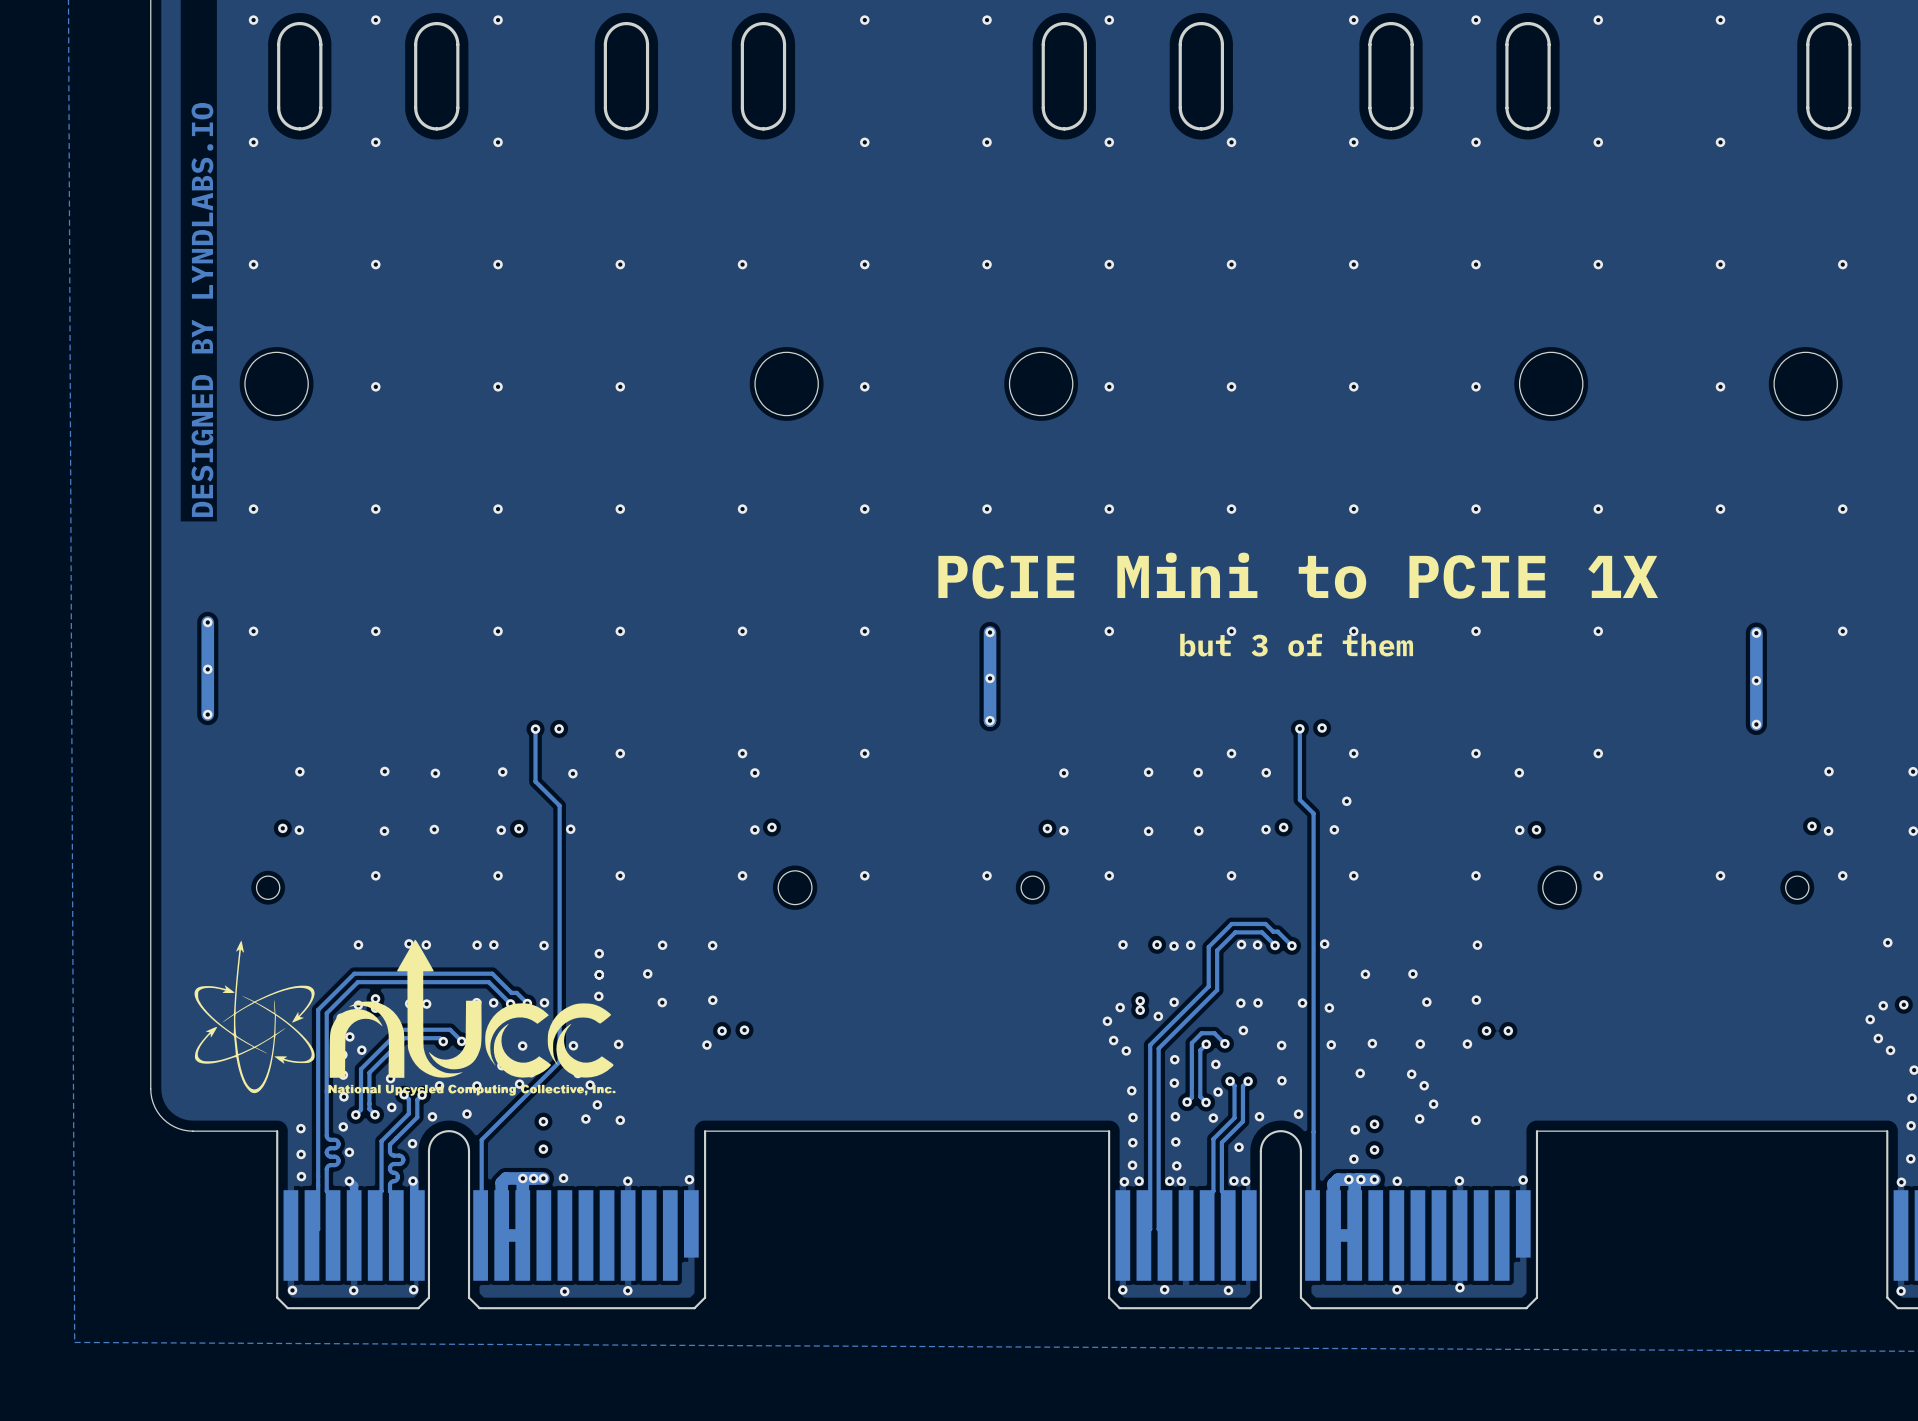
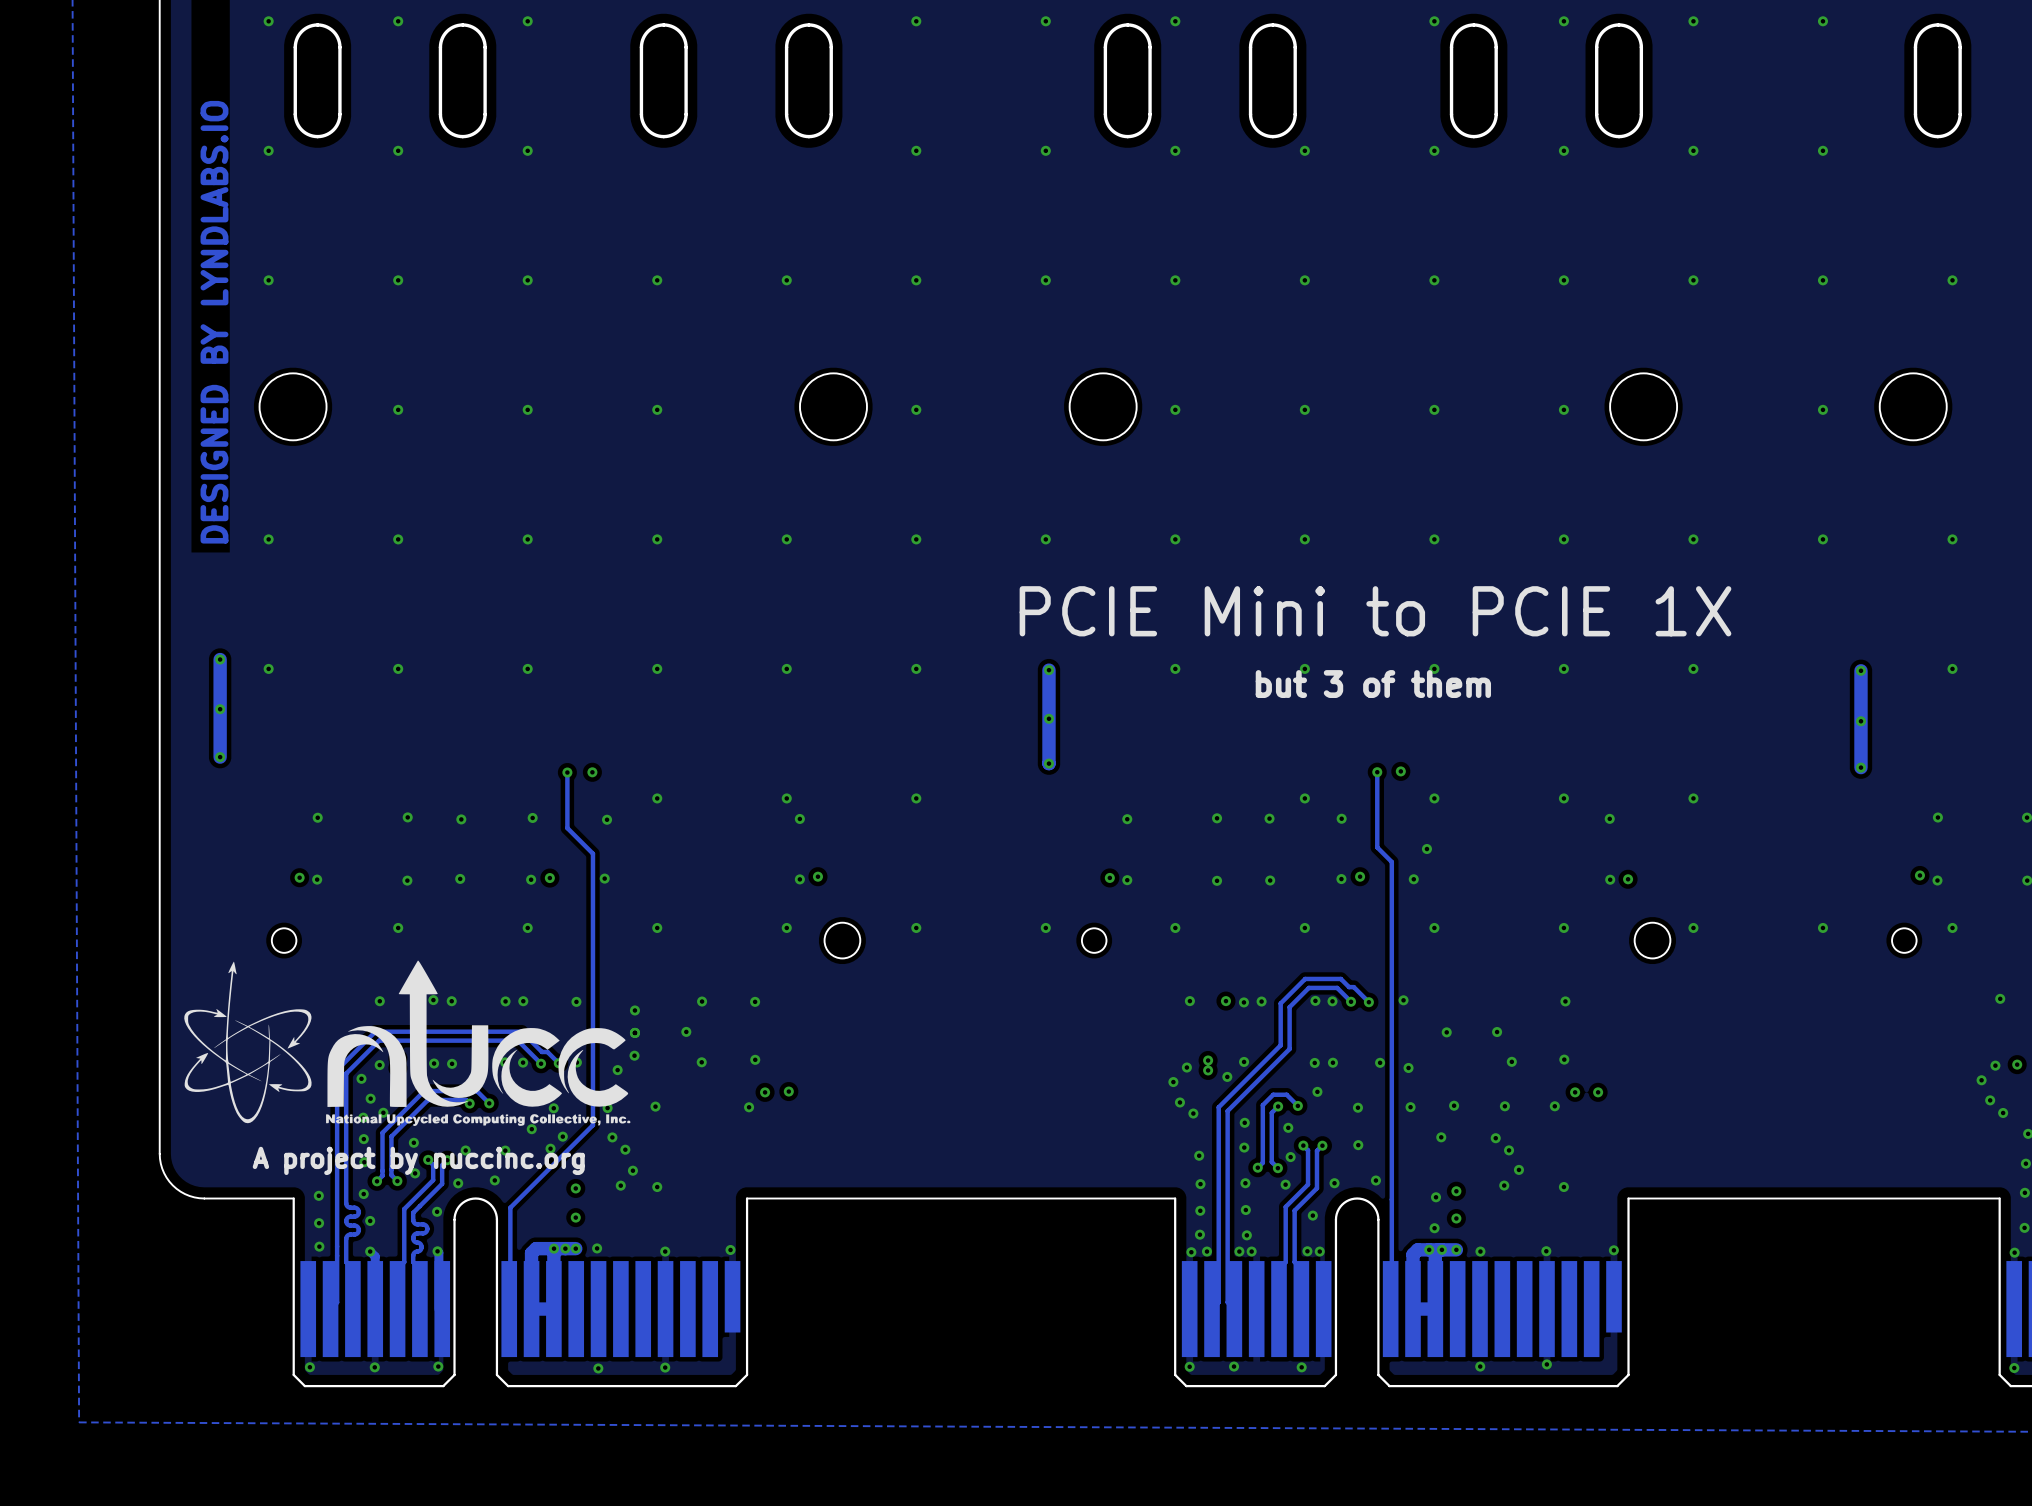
drawing position: (405, 1017) -> (407, 1043)
text: none -> A project by nuccinc.org (418, 1160)

